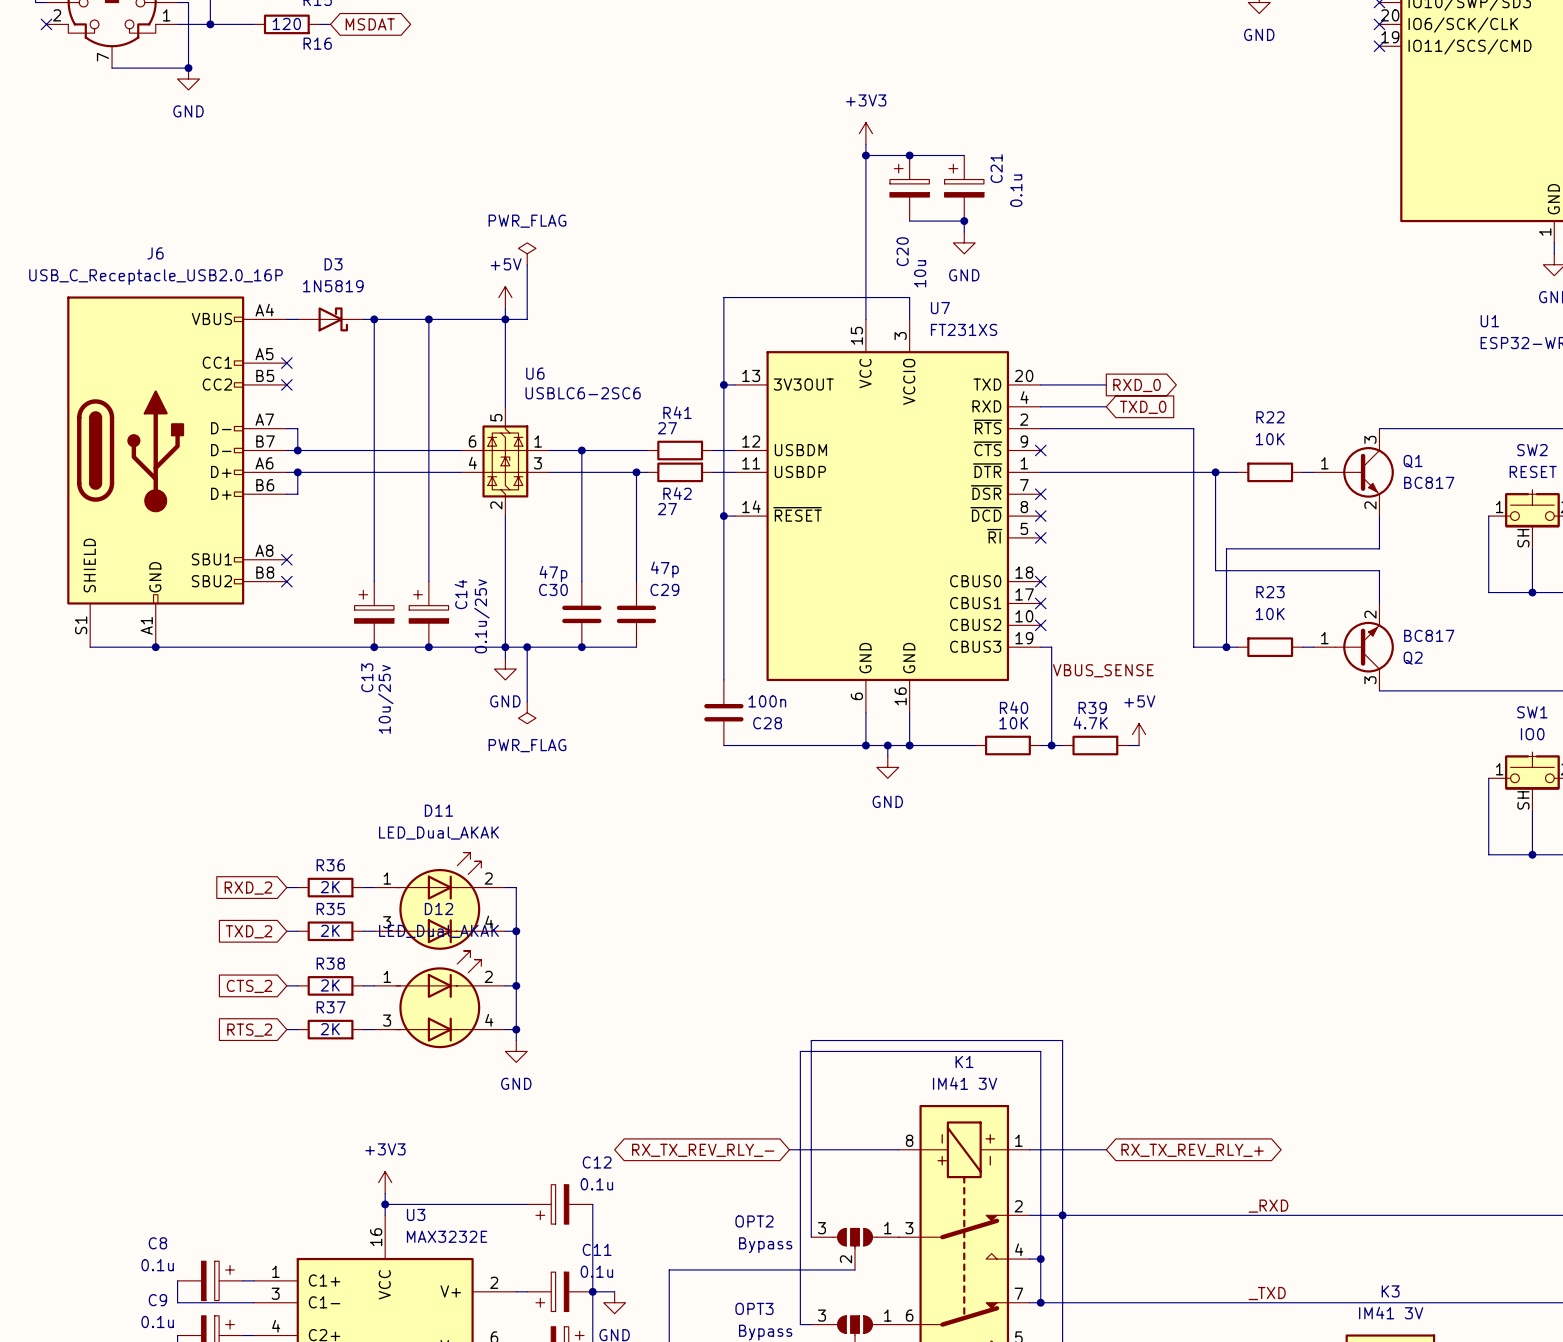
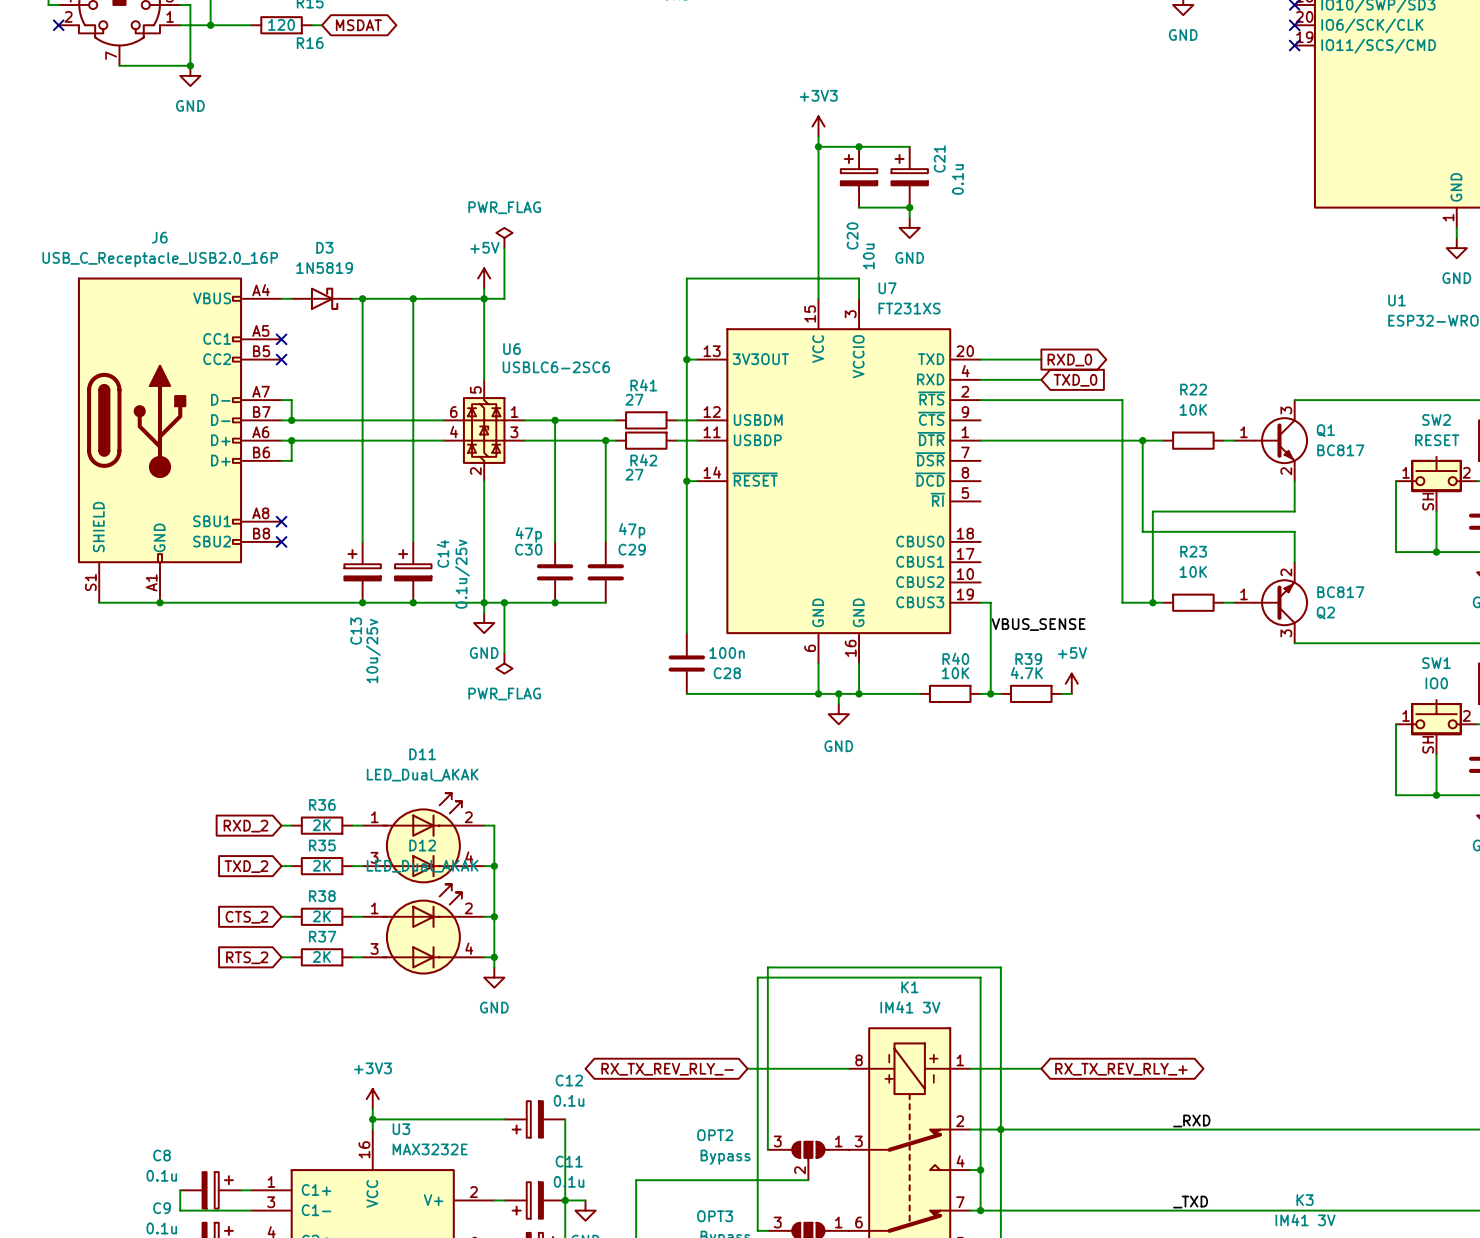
no-connect mark: (1040, 450) -> none
no-connect mark: (1040, 494) -> none
no-connect mark: (1040, 516) -> none
no-connect mark: (1040, 537) -> none
no-connect mark: (1040, 581) -> none
no-connect mark: (1040, 603) -> none
no-connect mark: (1040, 625) -> none

